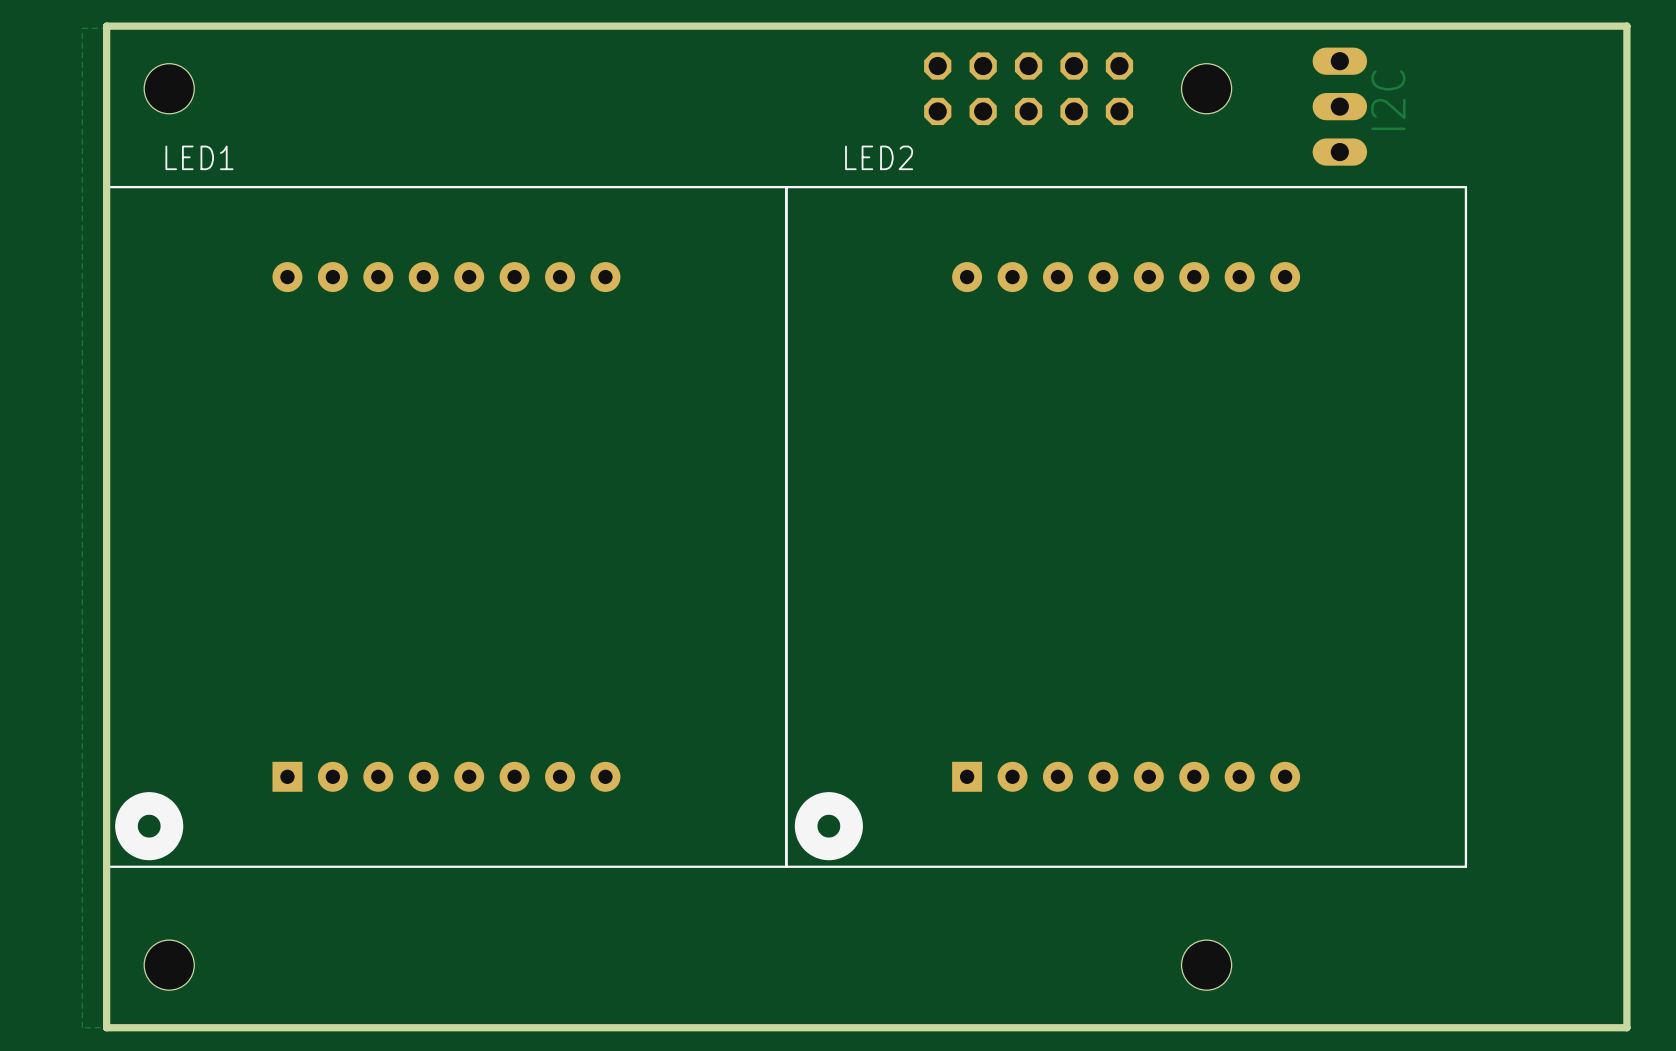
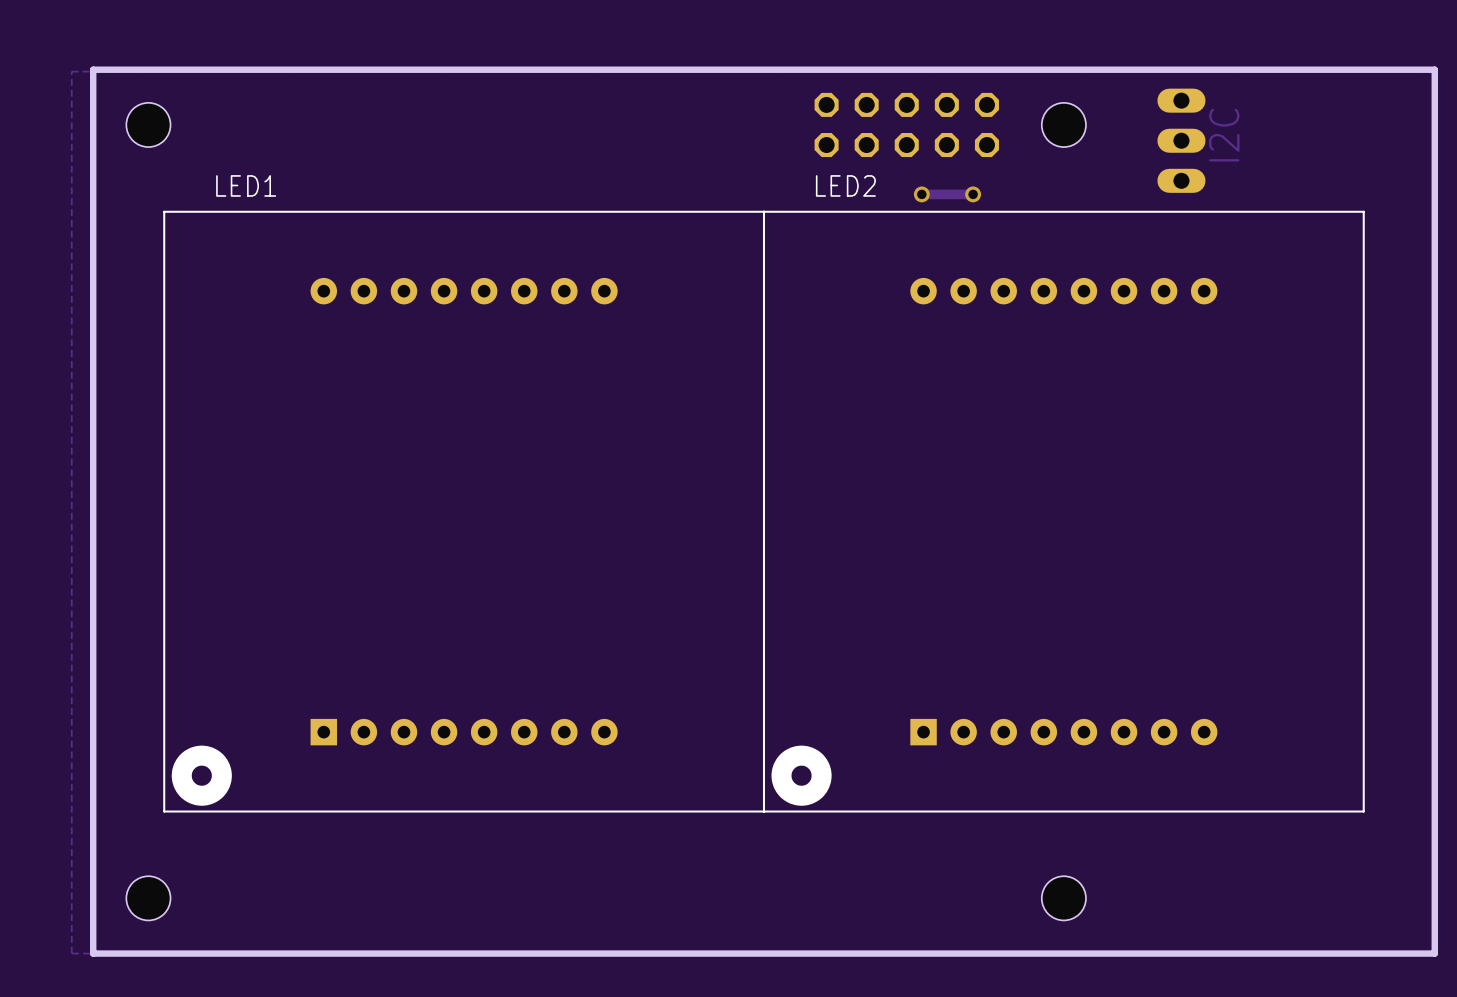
via: none -> (921, 194)
track: none -> (973, 194) (921, 194)
via: none -> (973, 194)
LED1 position: (446, 526) -> (464, 511)
LED2 position: (1126, 526) -> (1063, 511)

